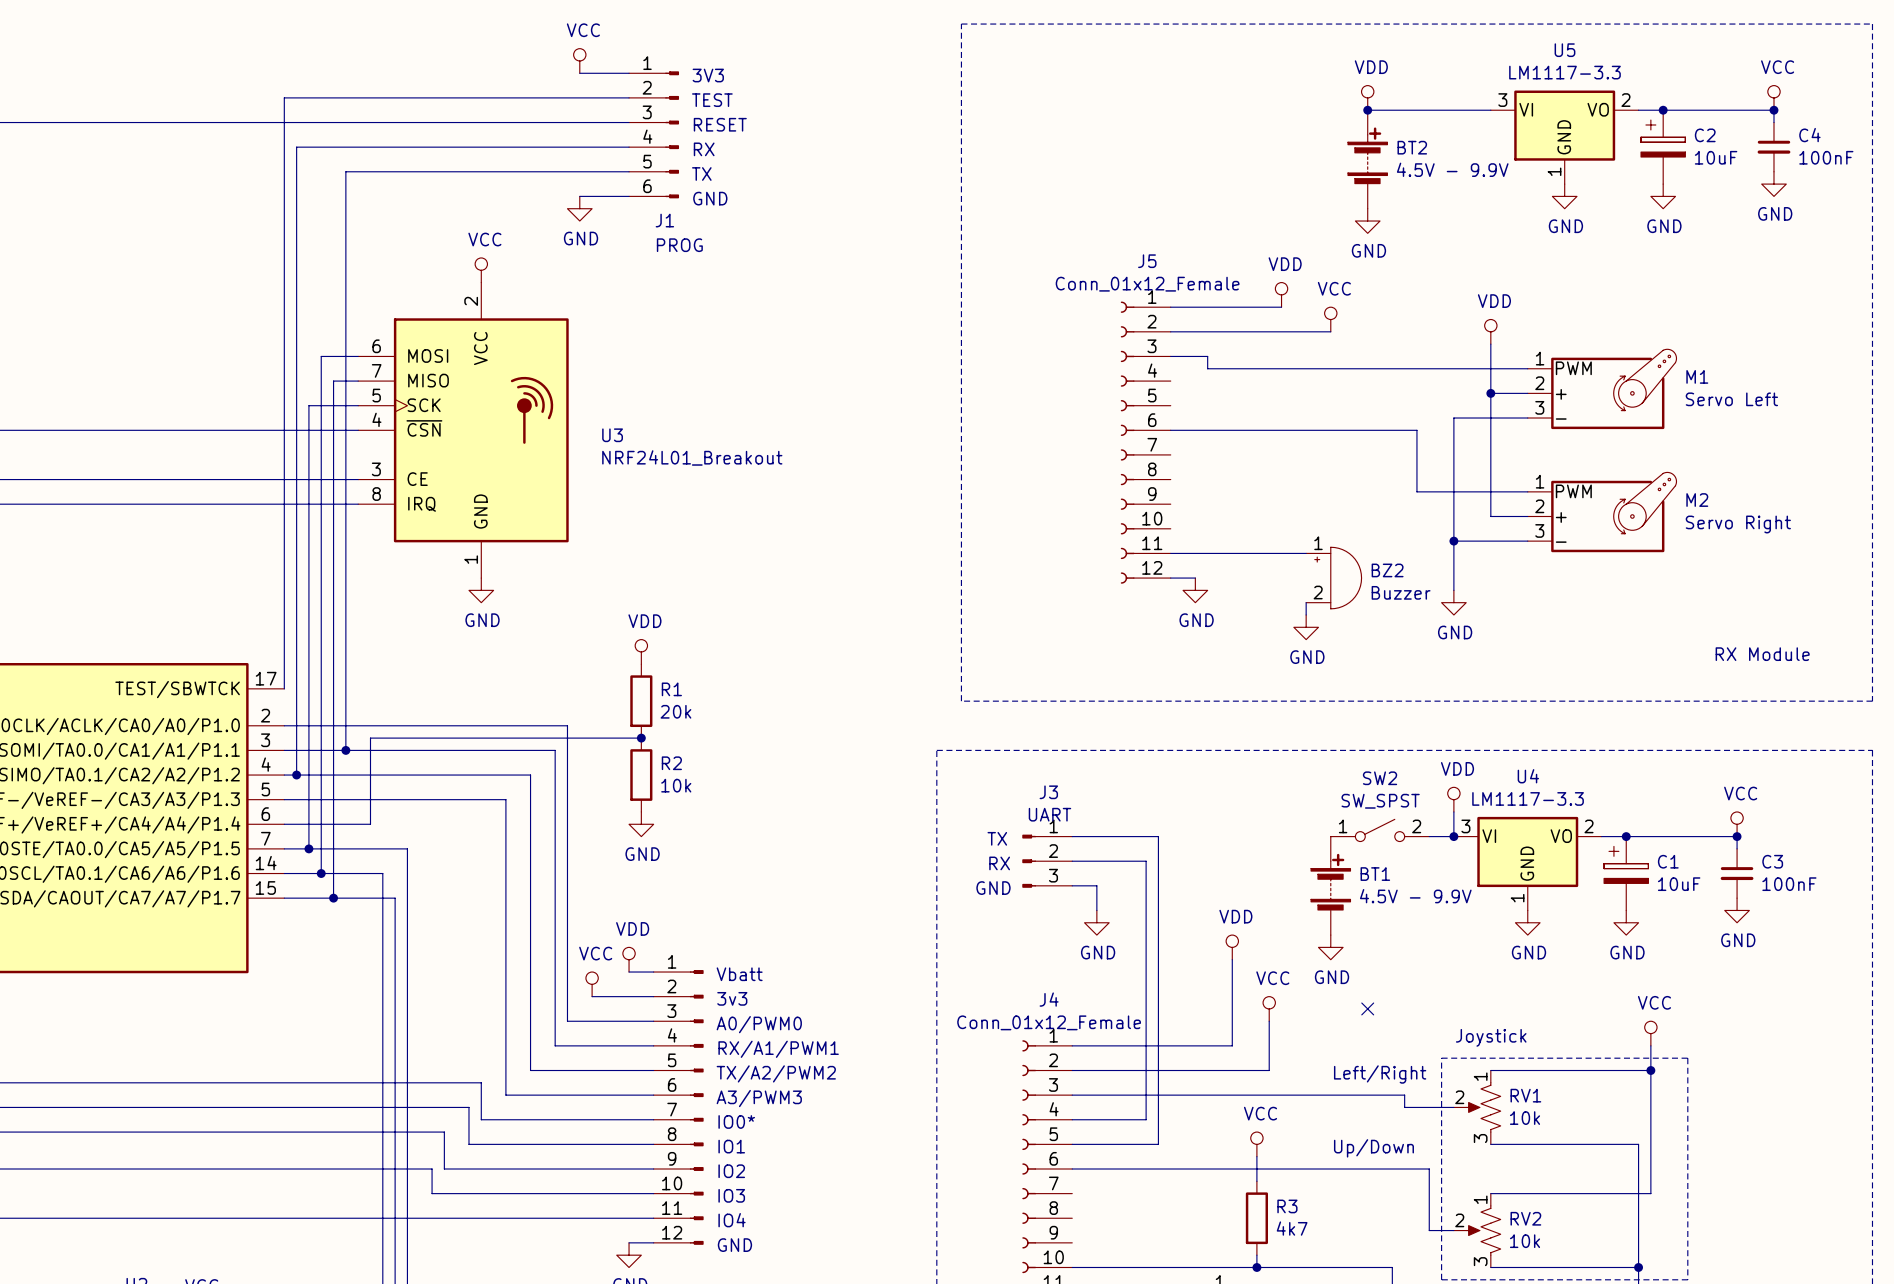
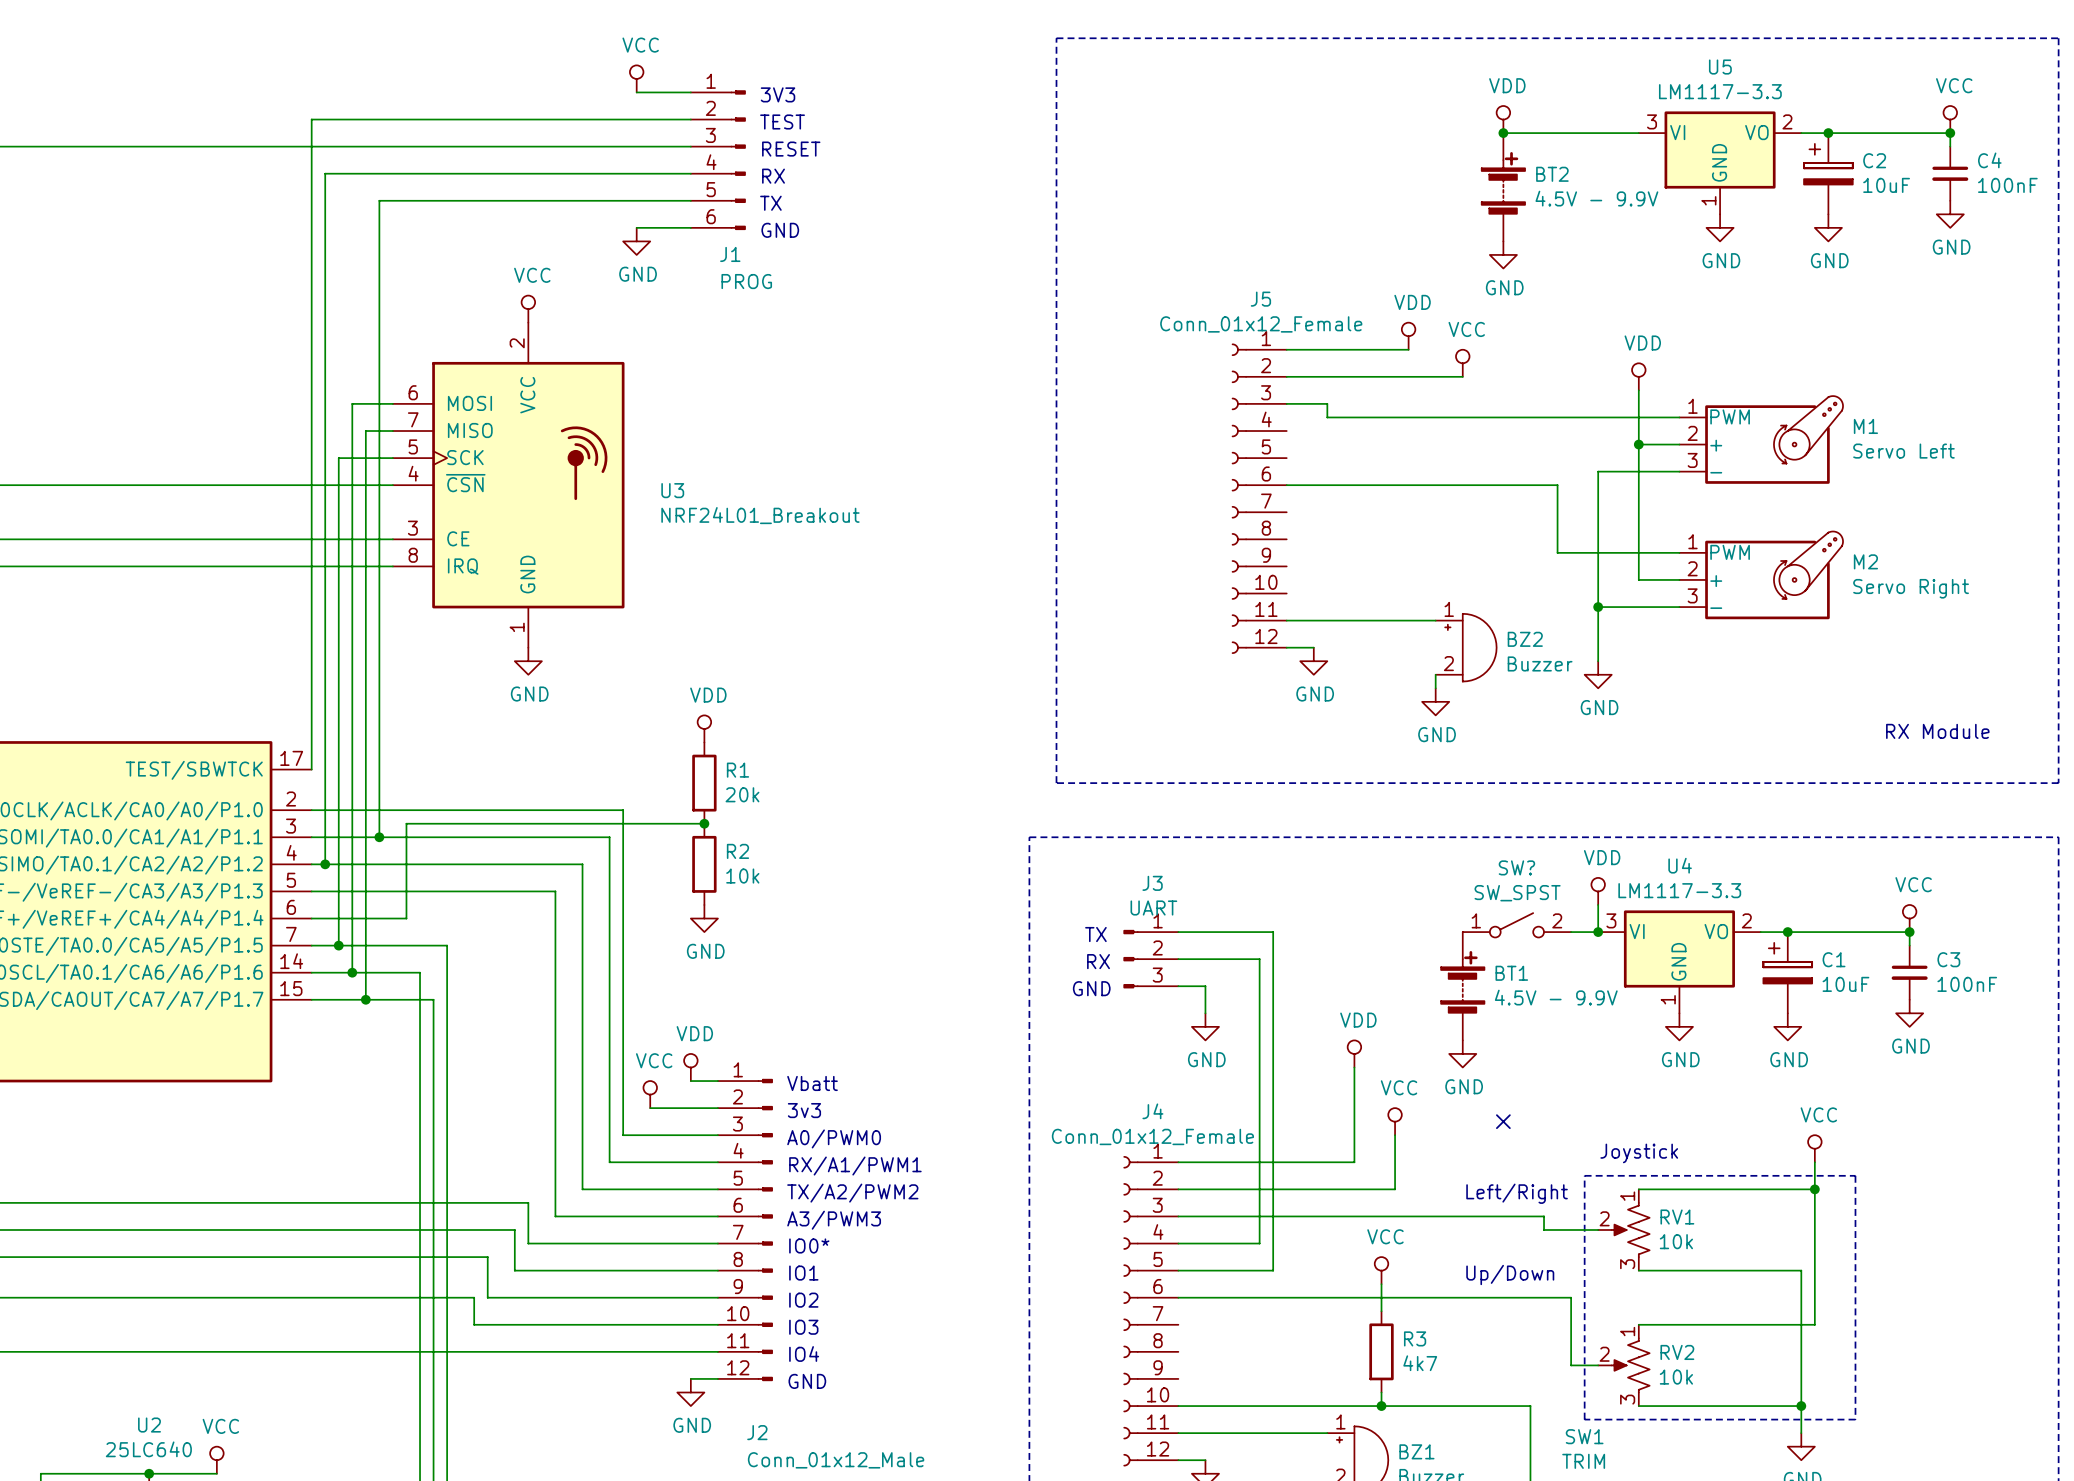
SW2 name: SW2 (1380, 778) -> SW? (1516, 867)

